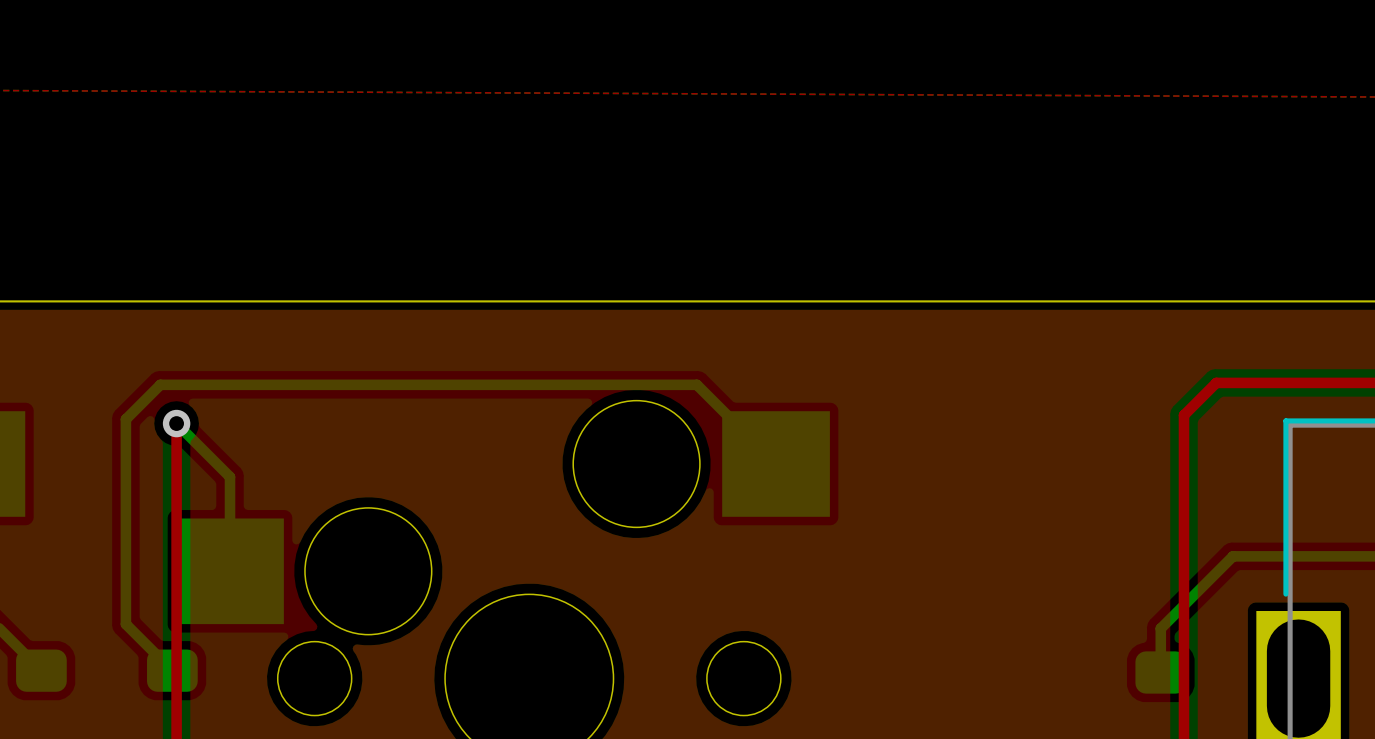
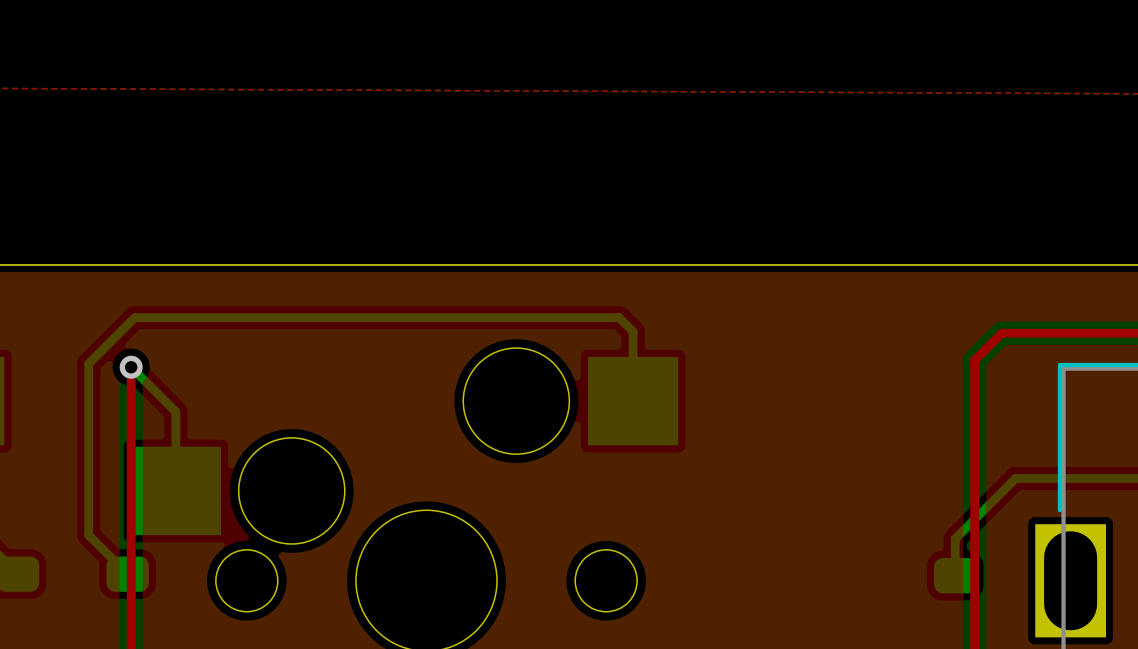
bottom track: (160, 384) (696, 384) (776, 464) -> (117, 334) (134, 317) (619, 317) (633, 331) (633, 401)

